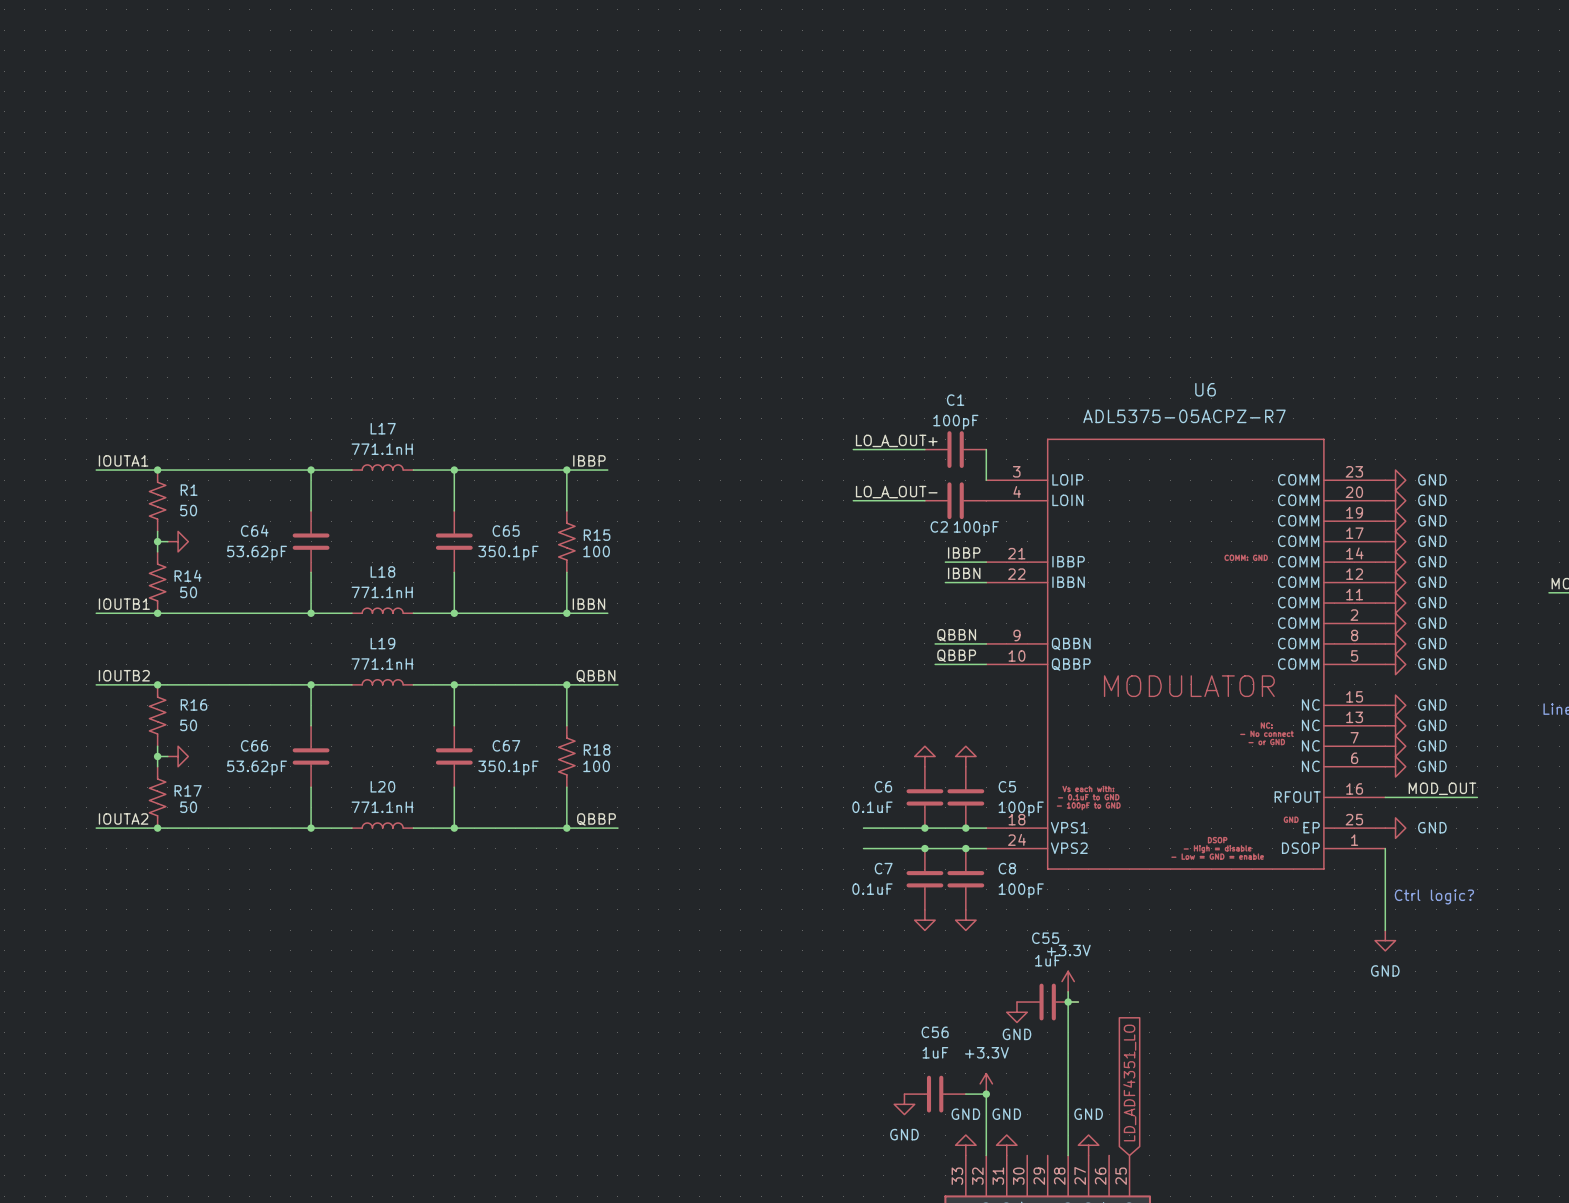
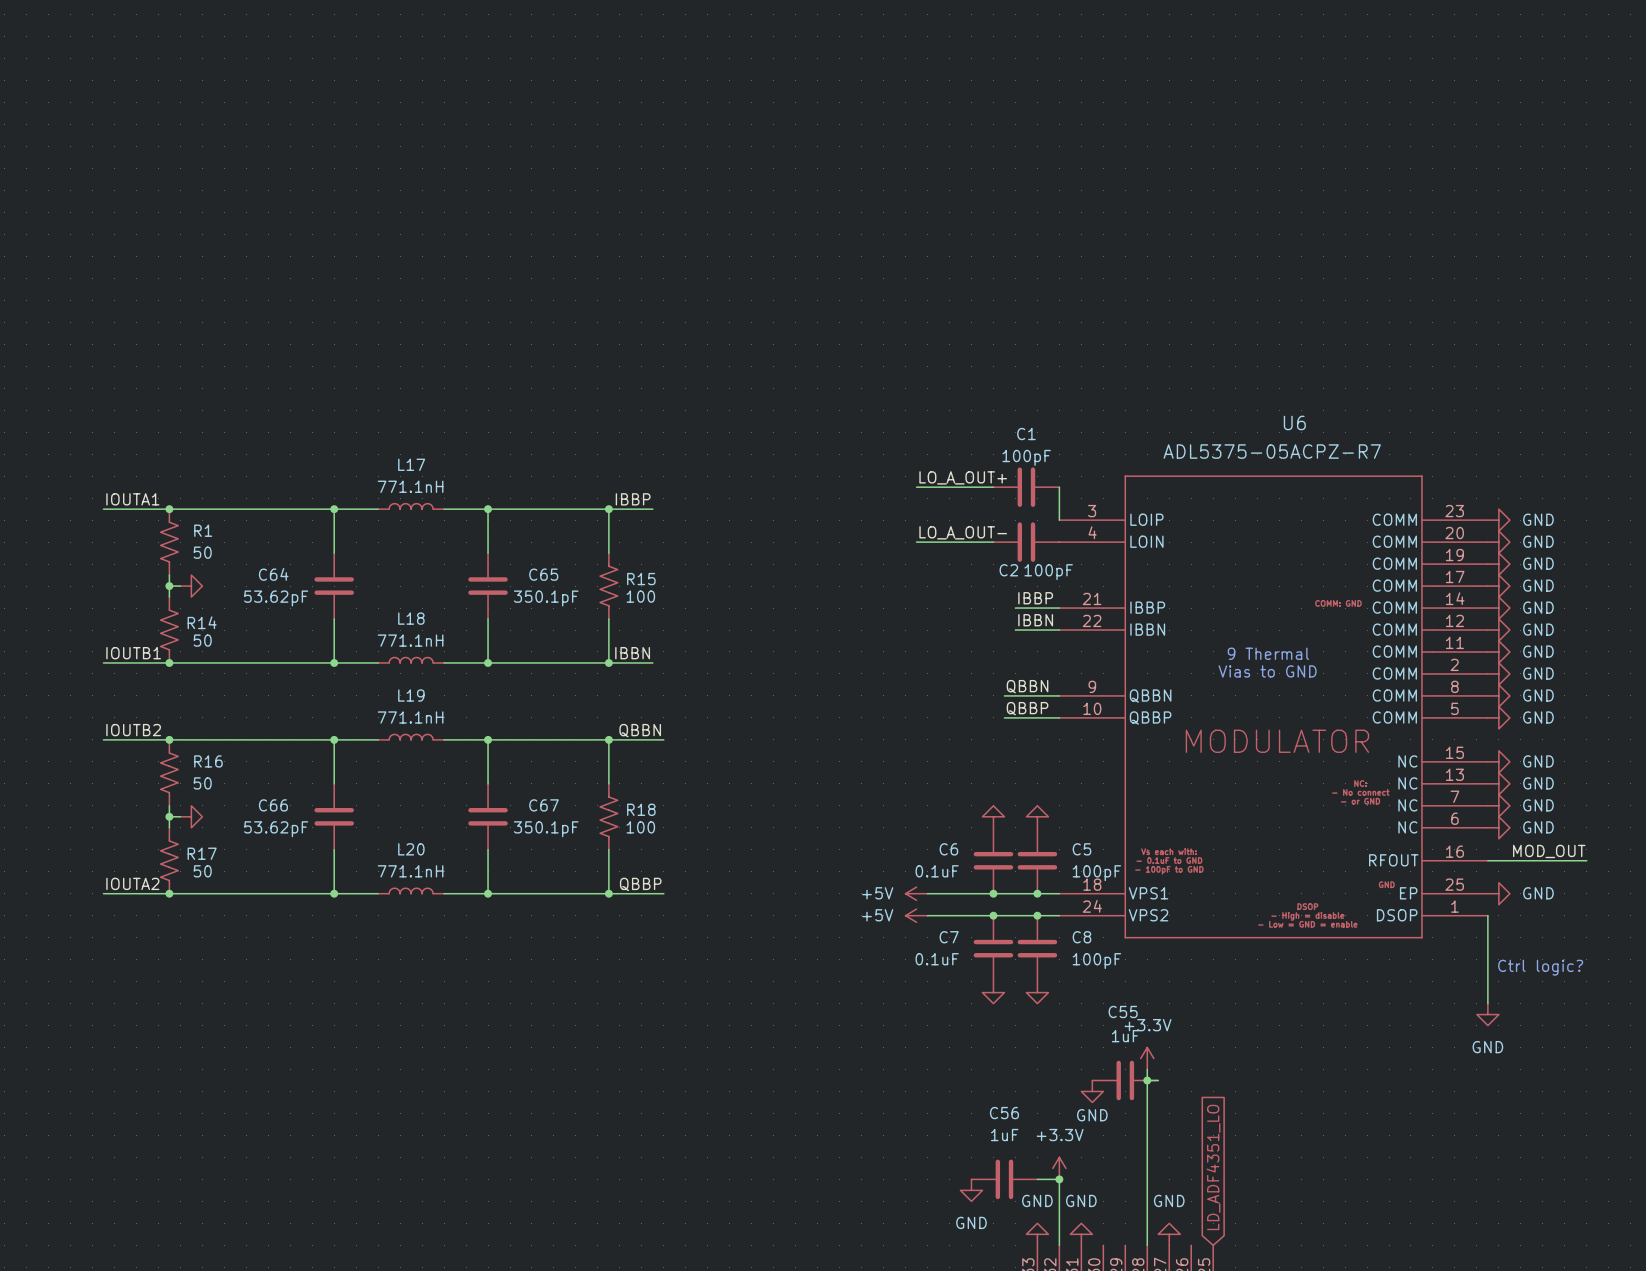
text: none -> 9 Thermal (1268, 653)
text: none -> Vias to GND (1267, 671)
power symbol: none -> +5V (916, 893)
power symbol: none -> +5V (916, 915)

